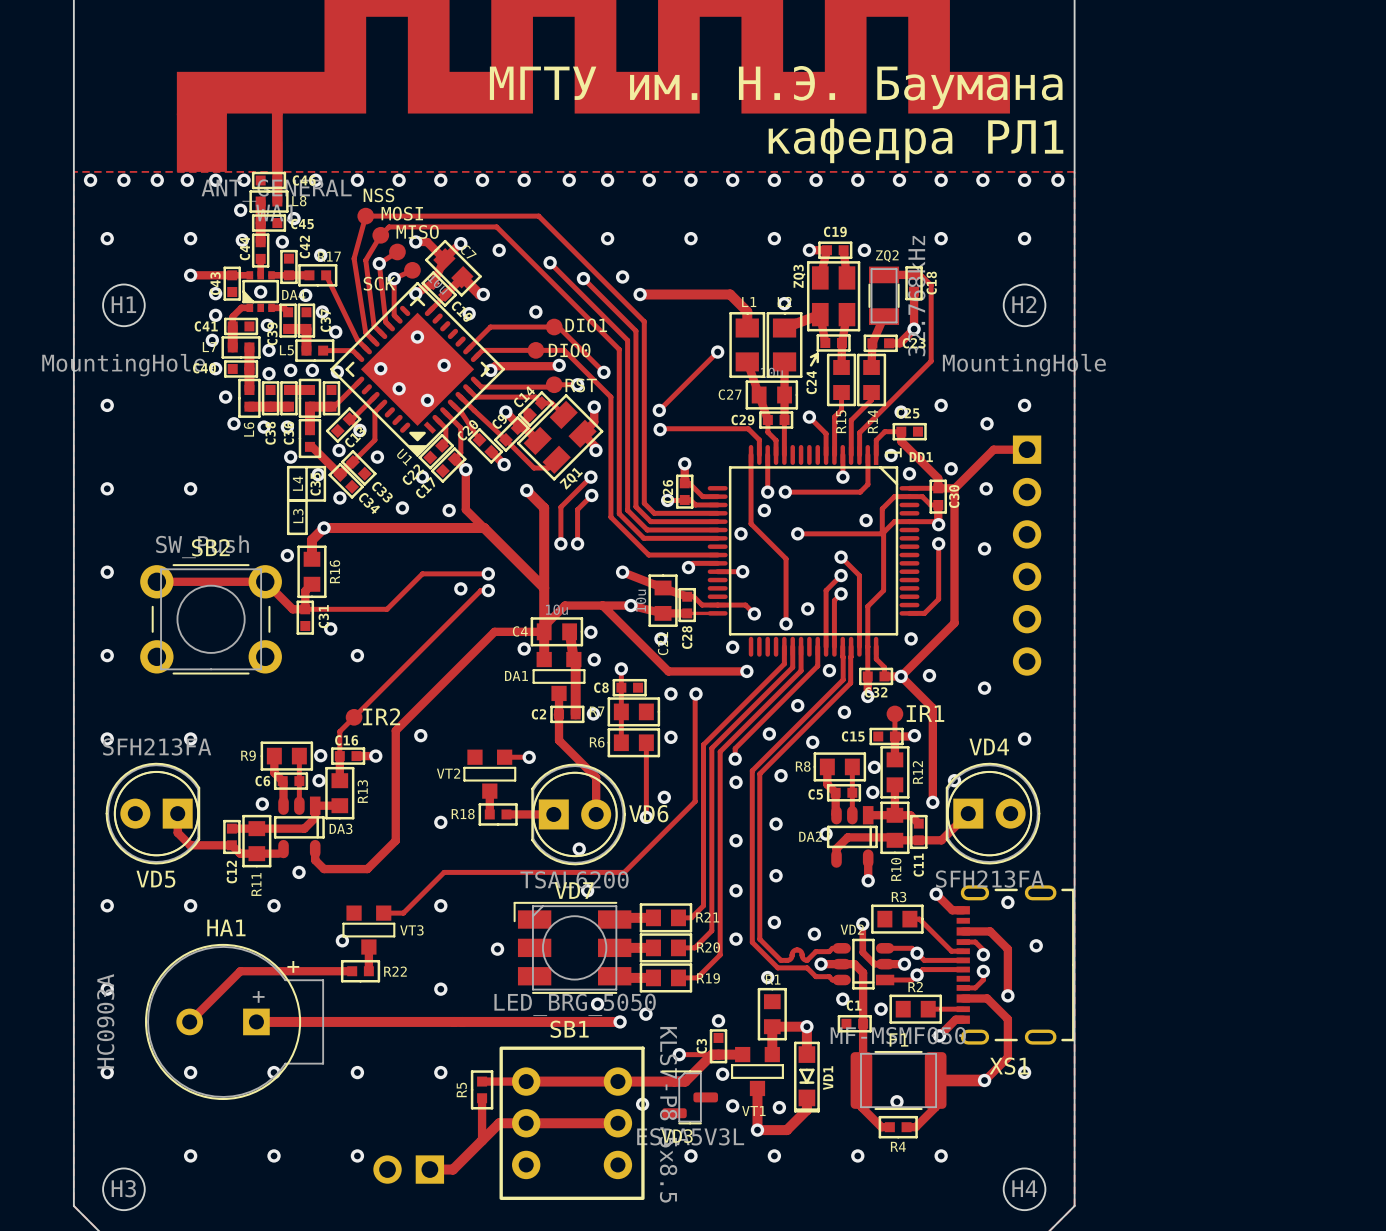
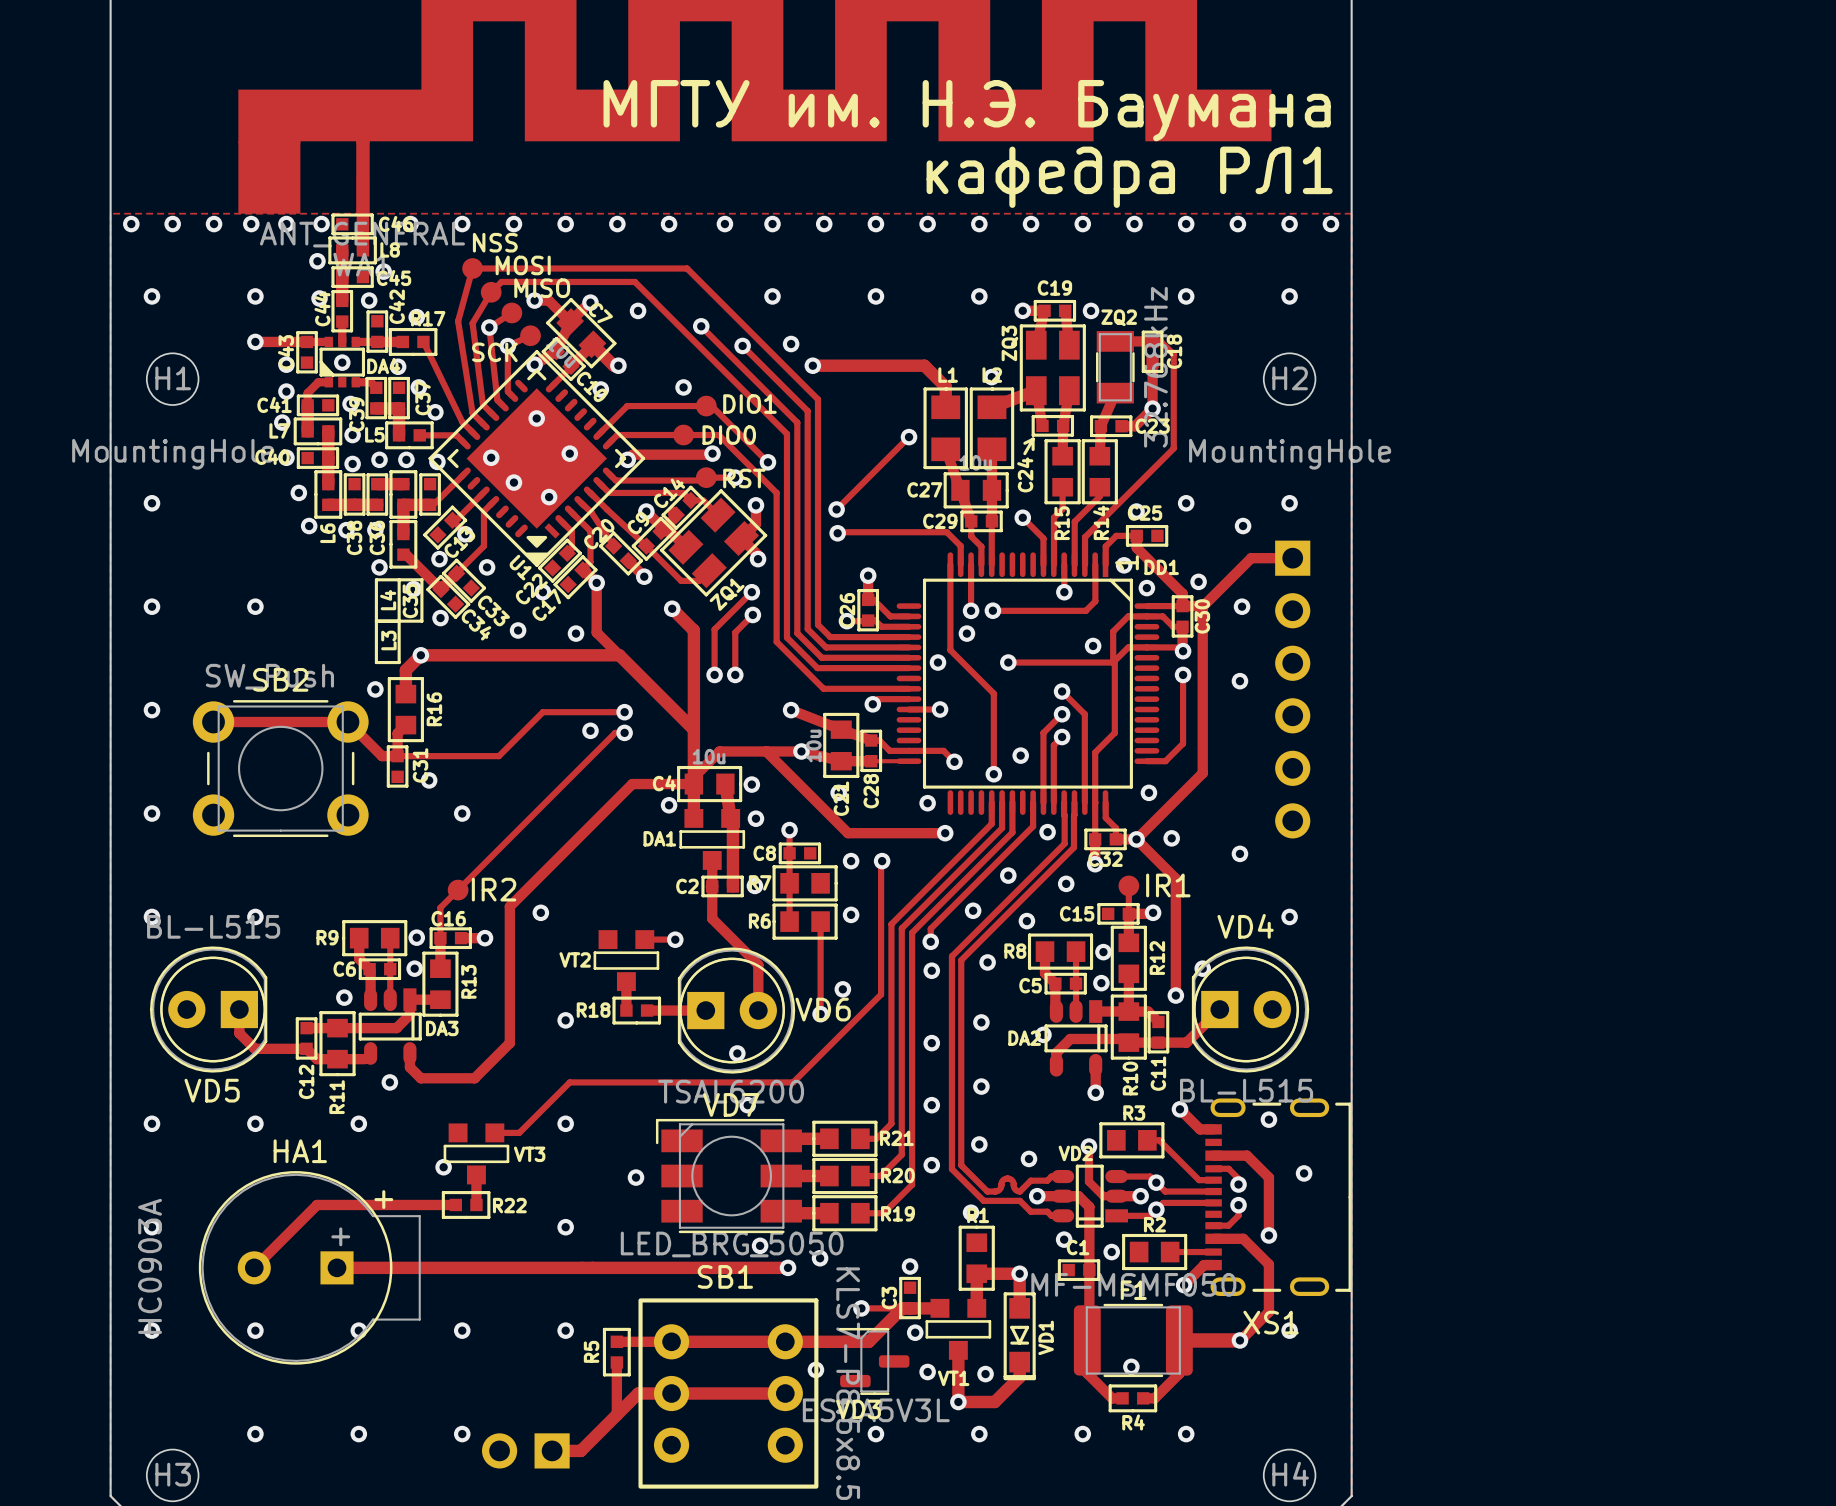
VD5 value: SFH213FA (157, 746) -> BL-L515 (213, 926)
VD4 value: SFH213FA (990, 879) -> BL-L515 (1246, 1090)

